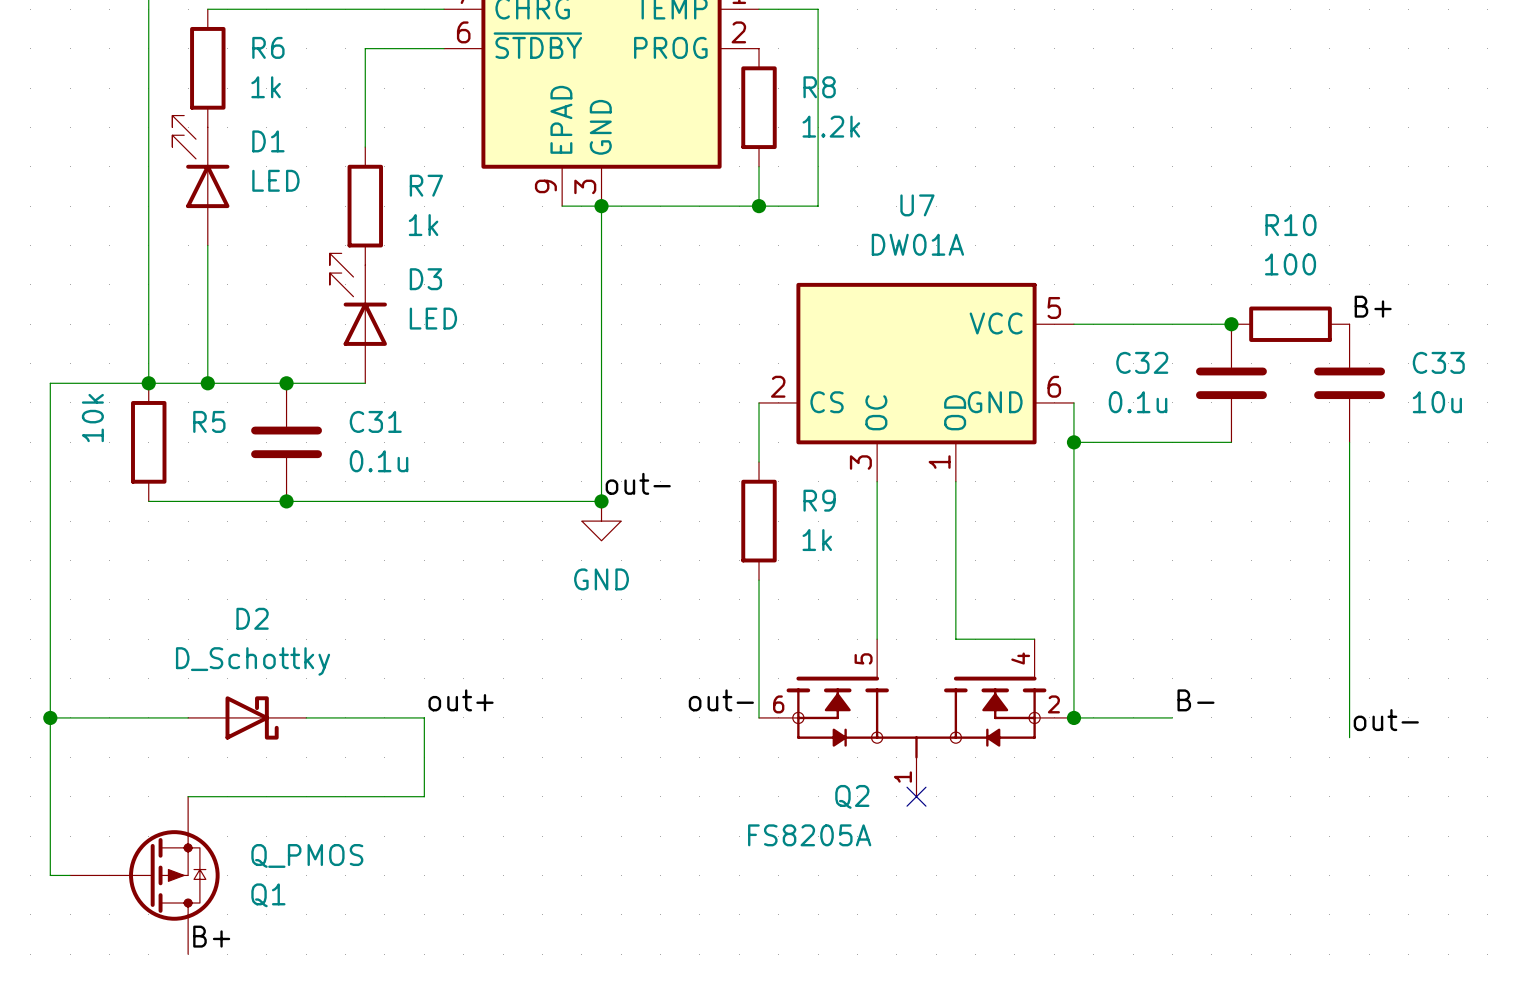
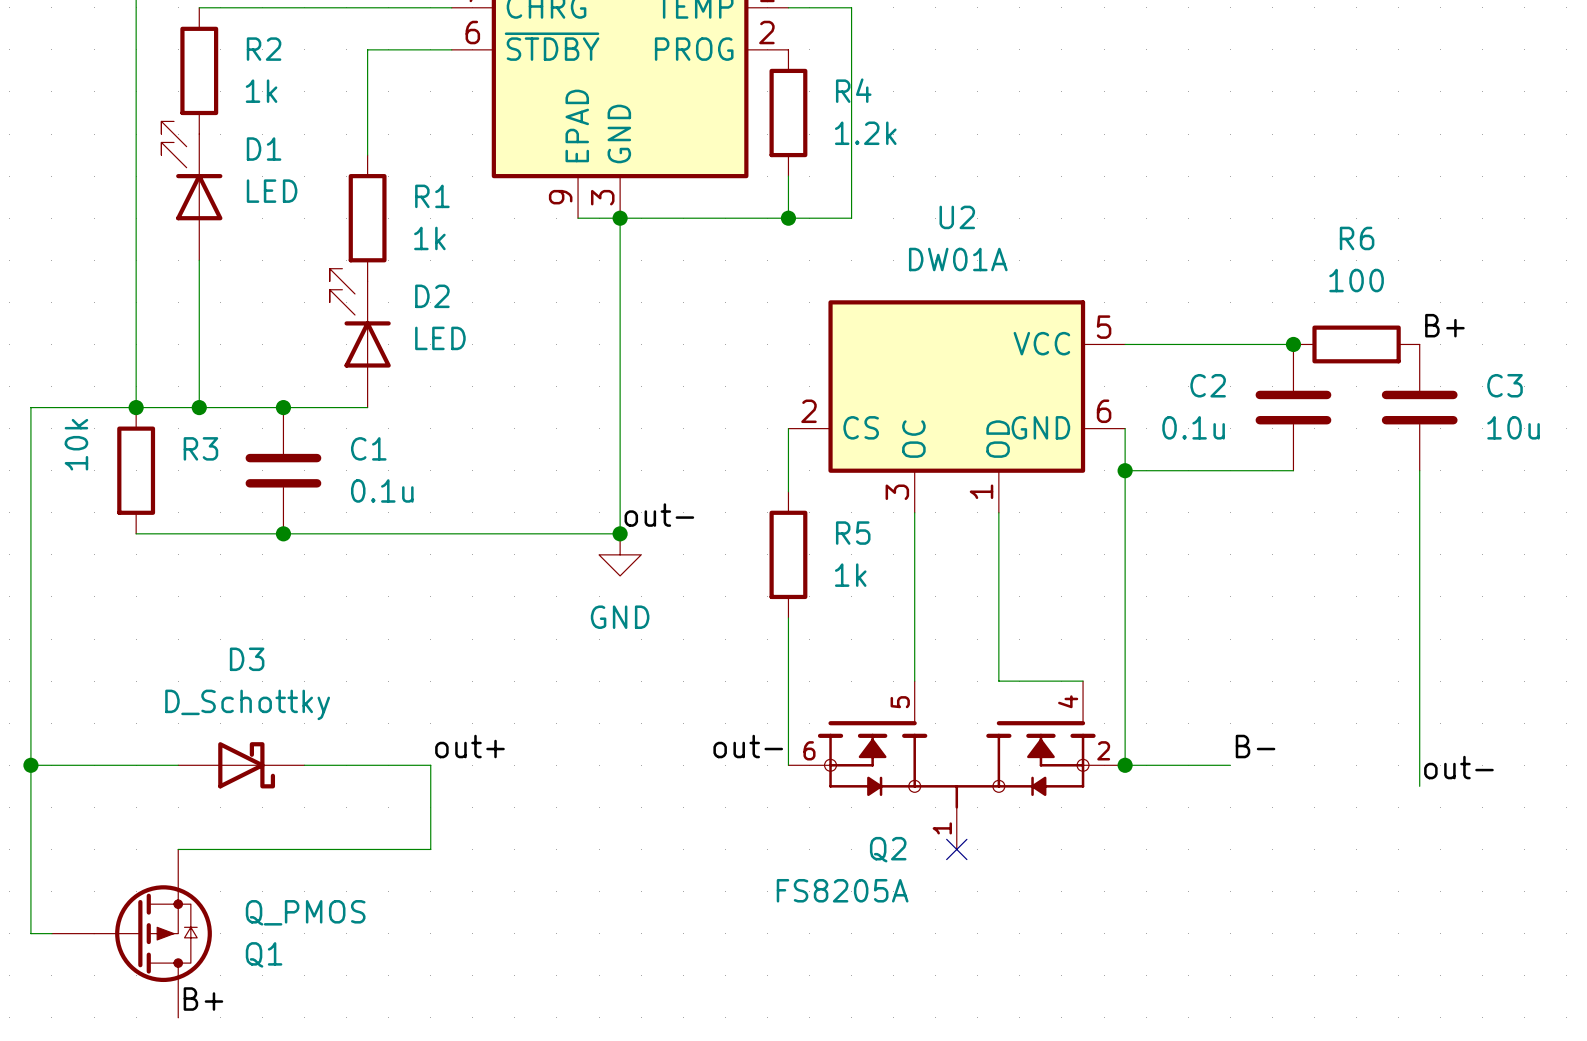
R6 name: R6 (268, 47) -> R2 (264, 49)
R8 name: R8 (819, 87) -> R4 (853, 90)
R7 name: R7 (426, 185) -> R1 (432, 196)
U7 name: U7 (917, 205) -> U2 (957, 217)
R10 name: R10 (1290, 225) -> R6 (1357, 238)
D3 name: D3 (425, 279) -> D2 (432, 296)
C32 name: C32 (1142, 362) -> C2 (1208, 385)
C33 name: C33 (1438, 362) -> C3 (1505, 385)
R5 name: R5 (209, 421) -> R3 (200, 448)
C31 name: C31 (375, 421) -> C1 (368, 448)
R9 name: R9 (819, 500) -> R5 (853, 533)
D2 name: D2 (252, 618) -> D3 (247, 659)

